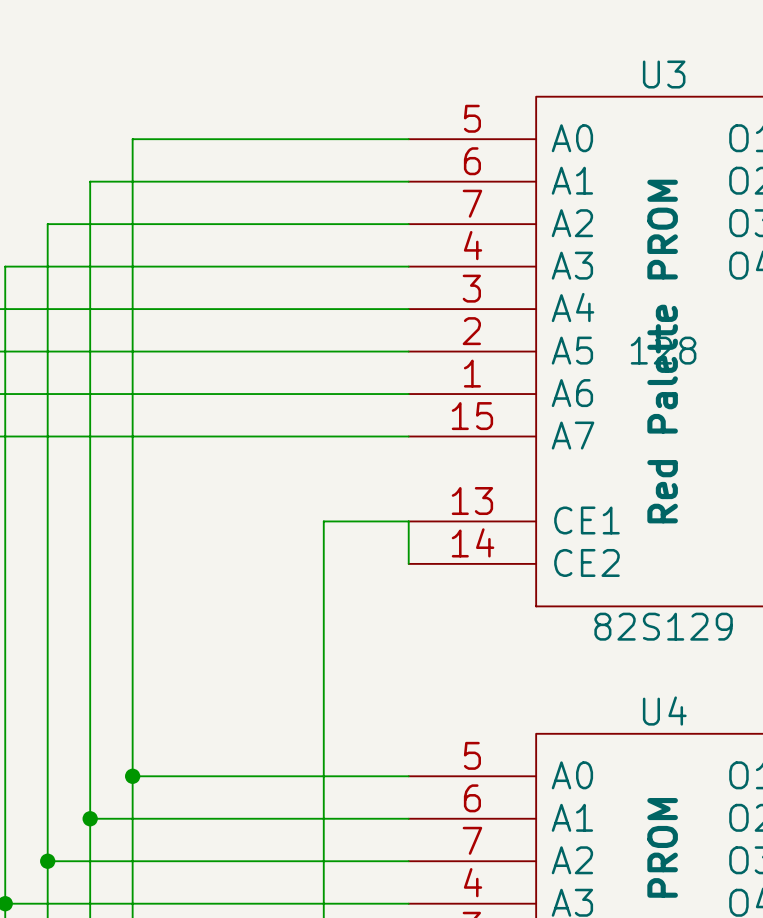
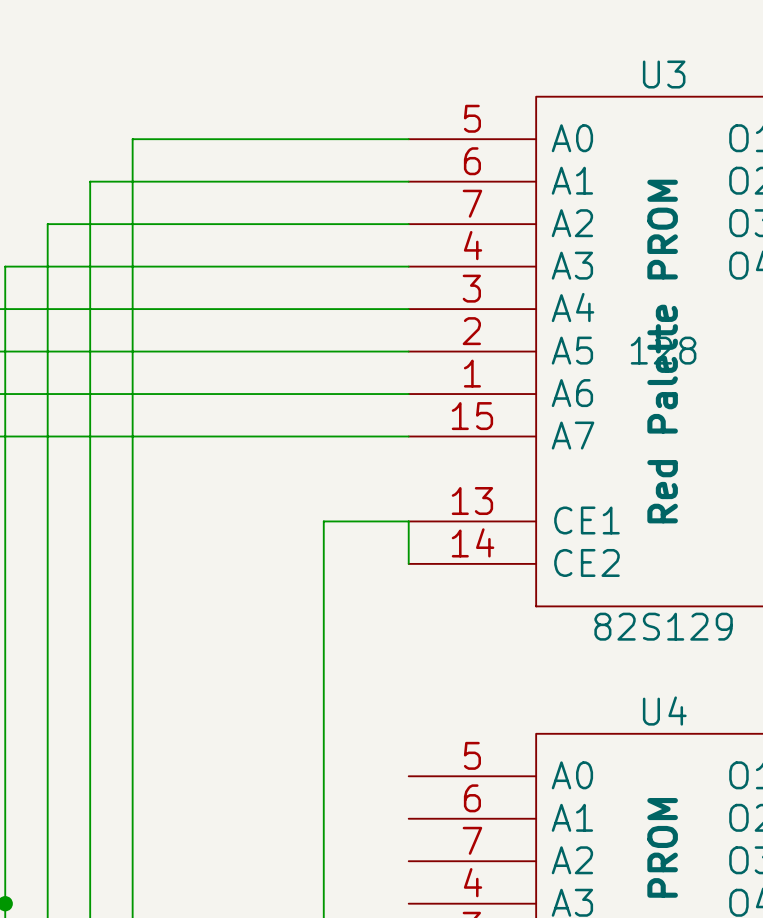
wire: (132, 776) (408, 776) -> none
junction: (132, 776) -> none
wire: (90, 818) (408, 818) -> none
junction: (90, 818) -> none
wire: (47, 861) (408, 861) -> none
junction: (47, 861) -> none
wire: (5, 903) (408, 903) -> none

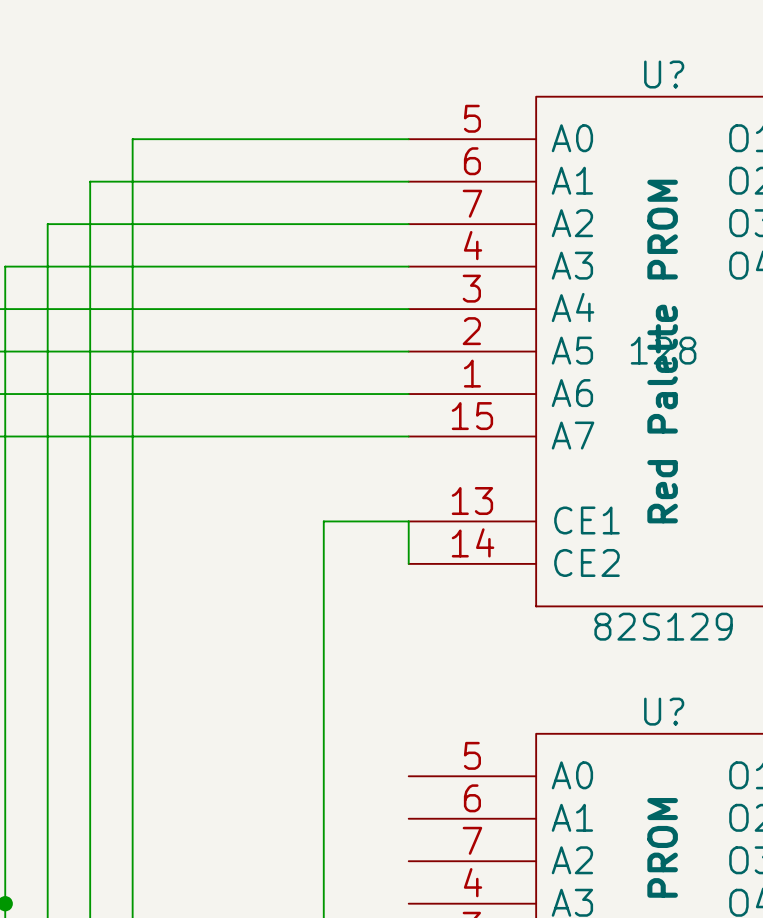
U3 name: U3 (664, 74) -> U? (664, 74)
U4 name: U4 (664, 711) -> U? (664, 711)

